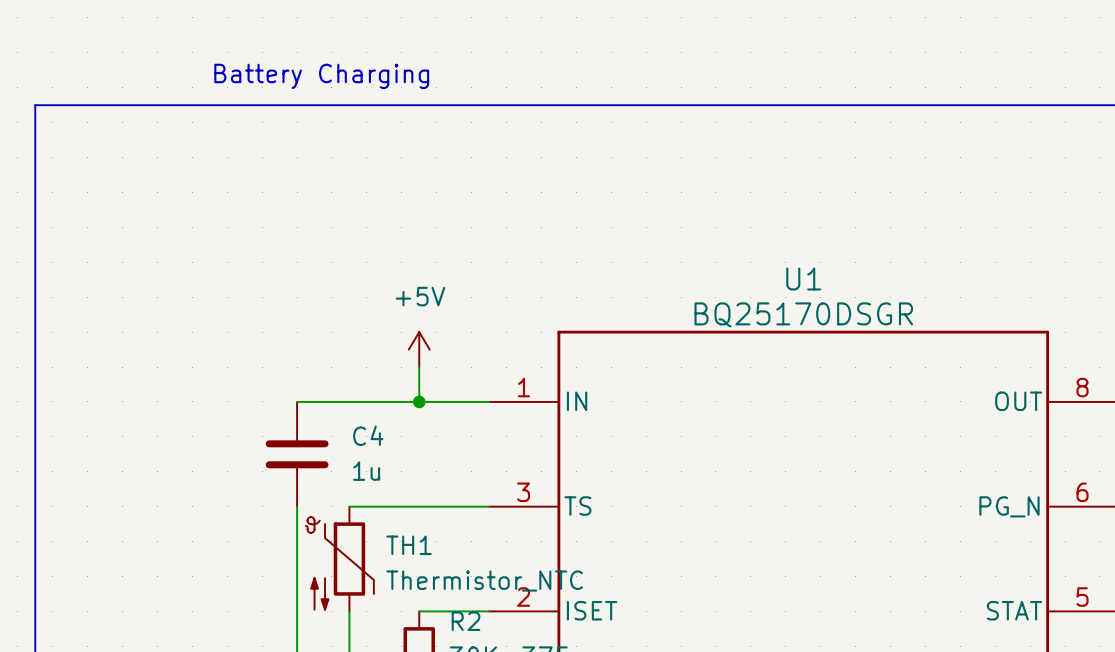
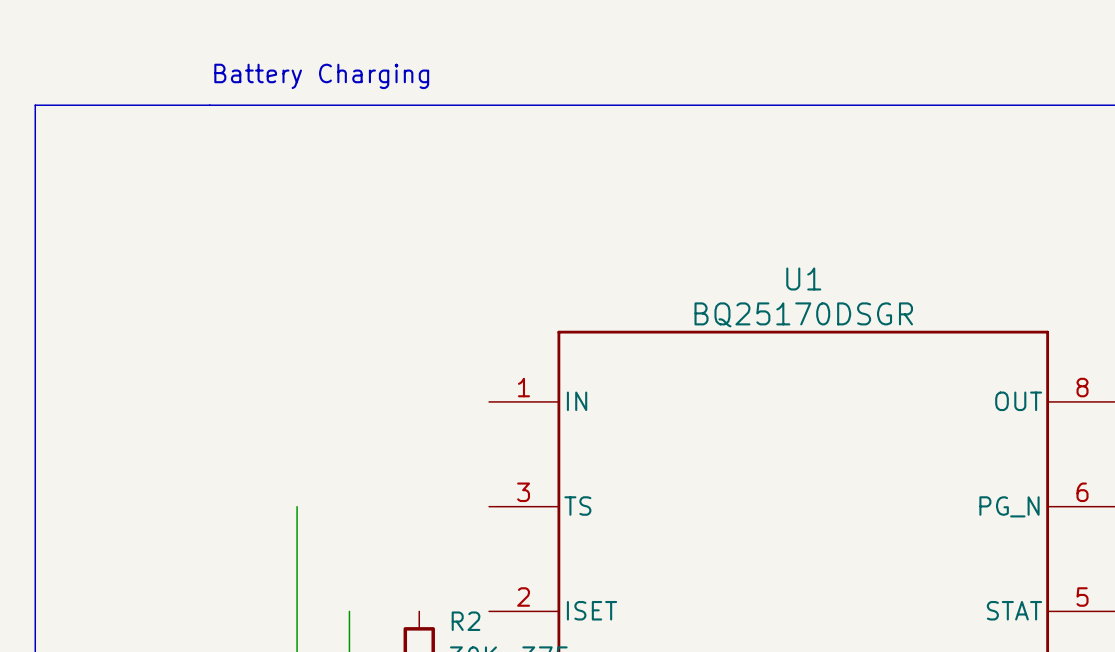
power symbol: +5V (419, 349) -> none
wire: (419, 367) (419, 401) -> none
wire: (297, 401) (489, 401) -> none
junction: (419, 401) -> none
C4: 1u (297, 454) -> none
wire: (349, 506) (489, 506) -> none
TH1: Thermistor_NTC (339, 559) -> none
wire: (419, 611) (489, 611) -> none

